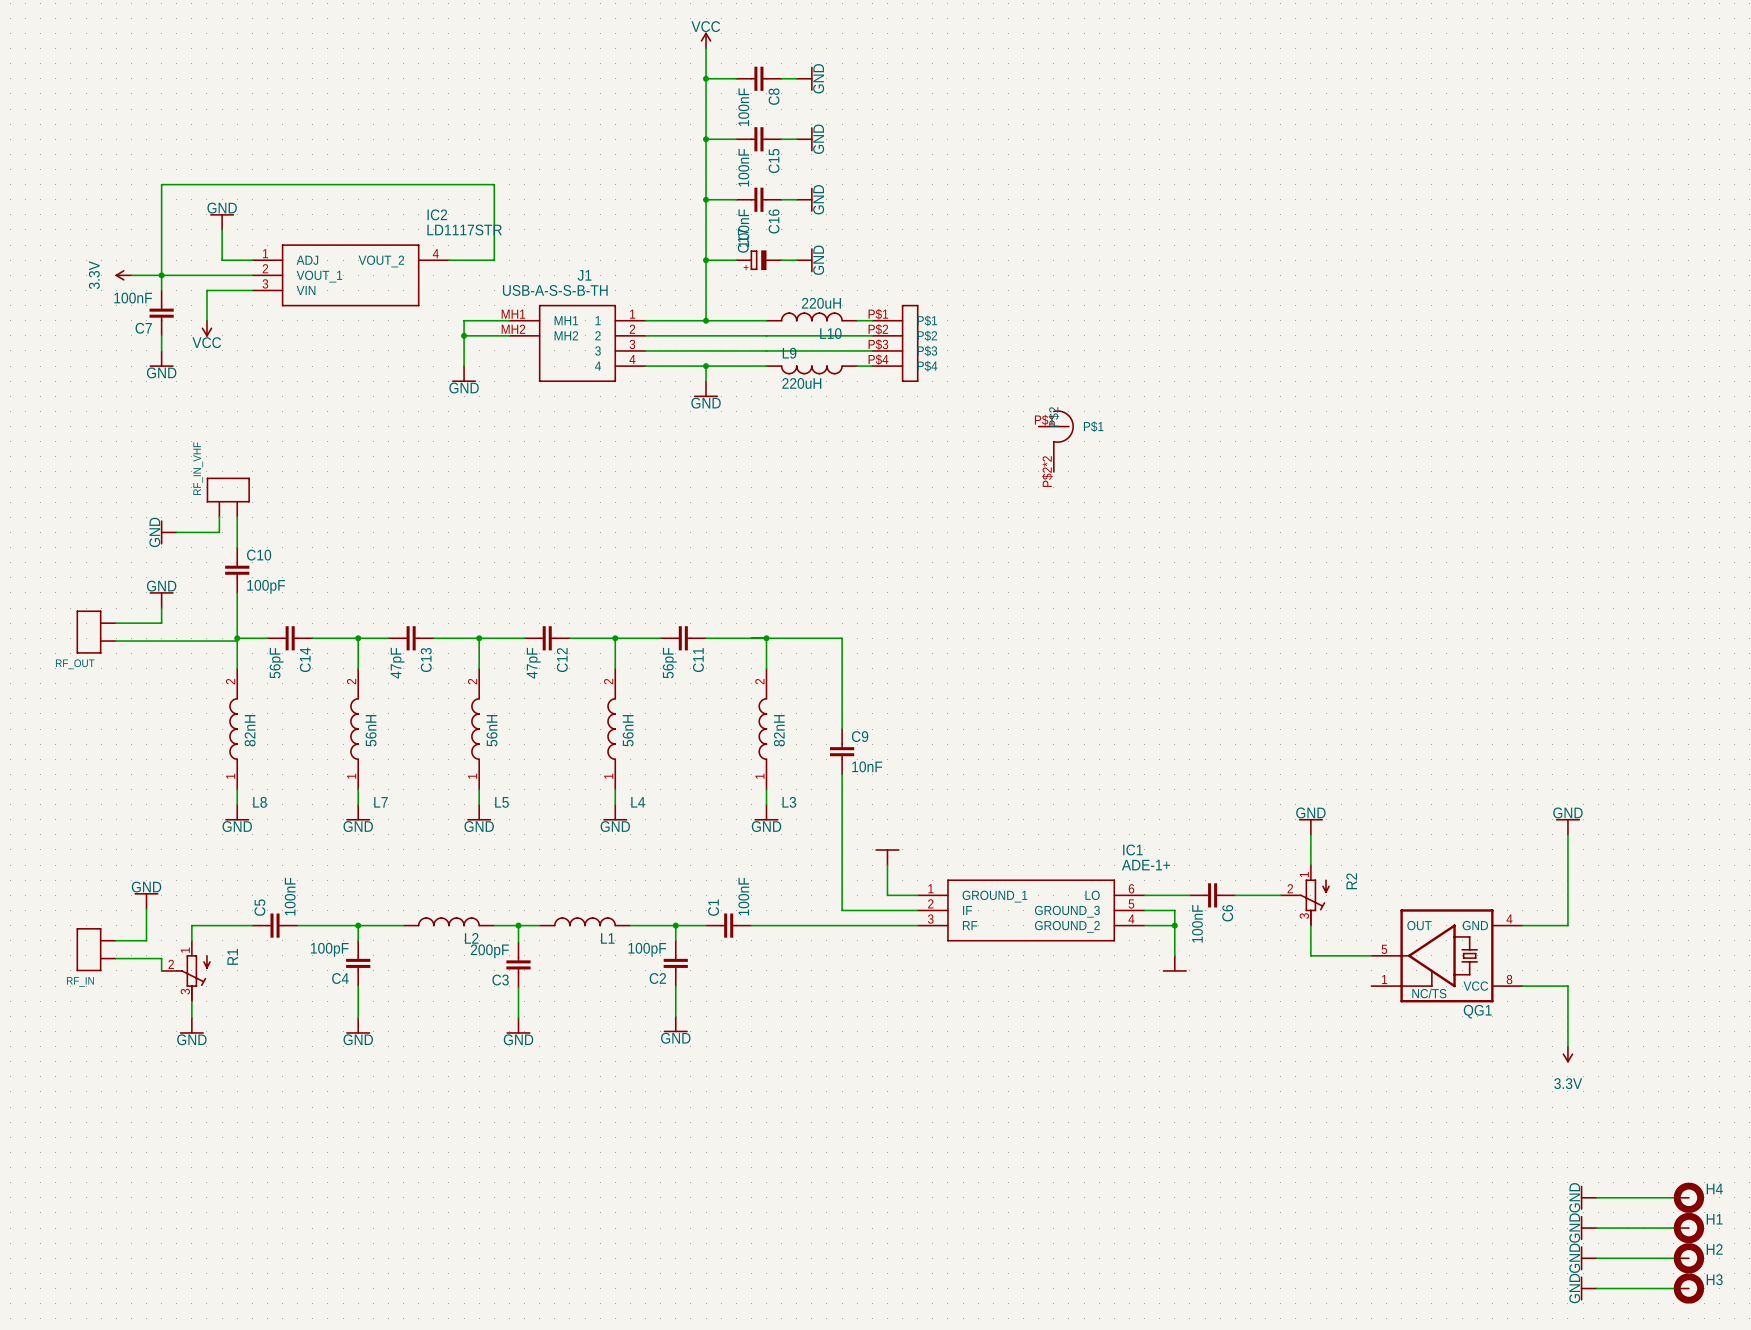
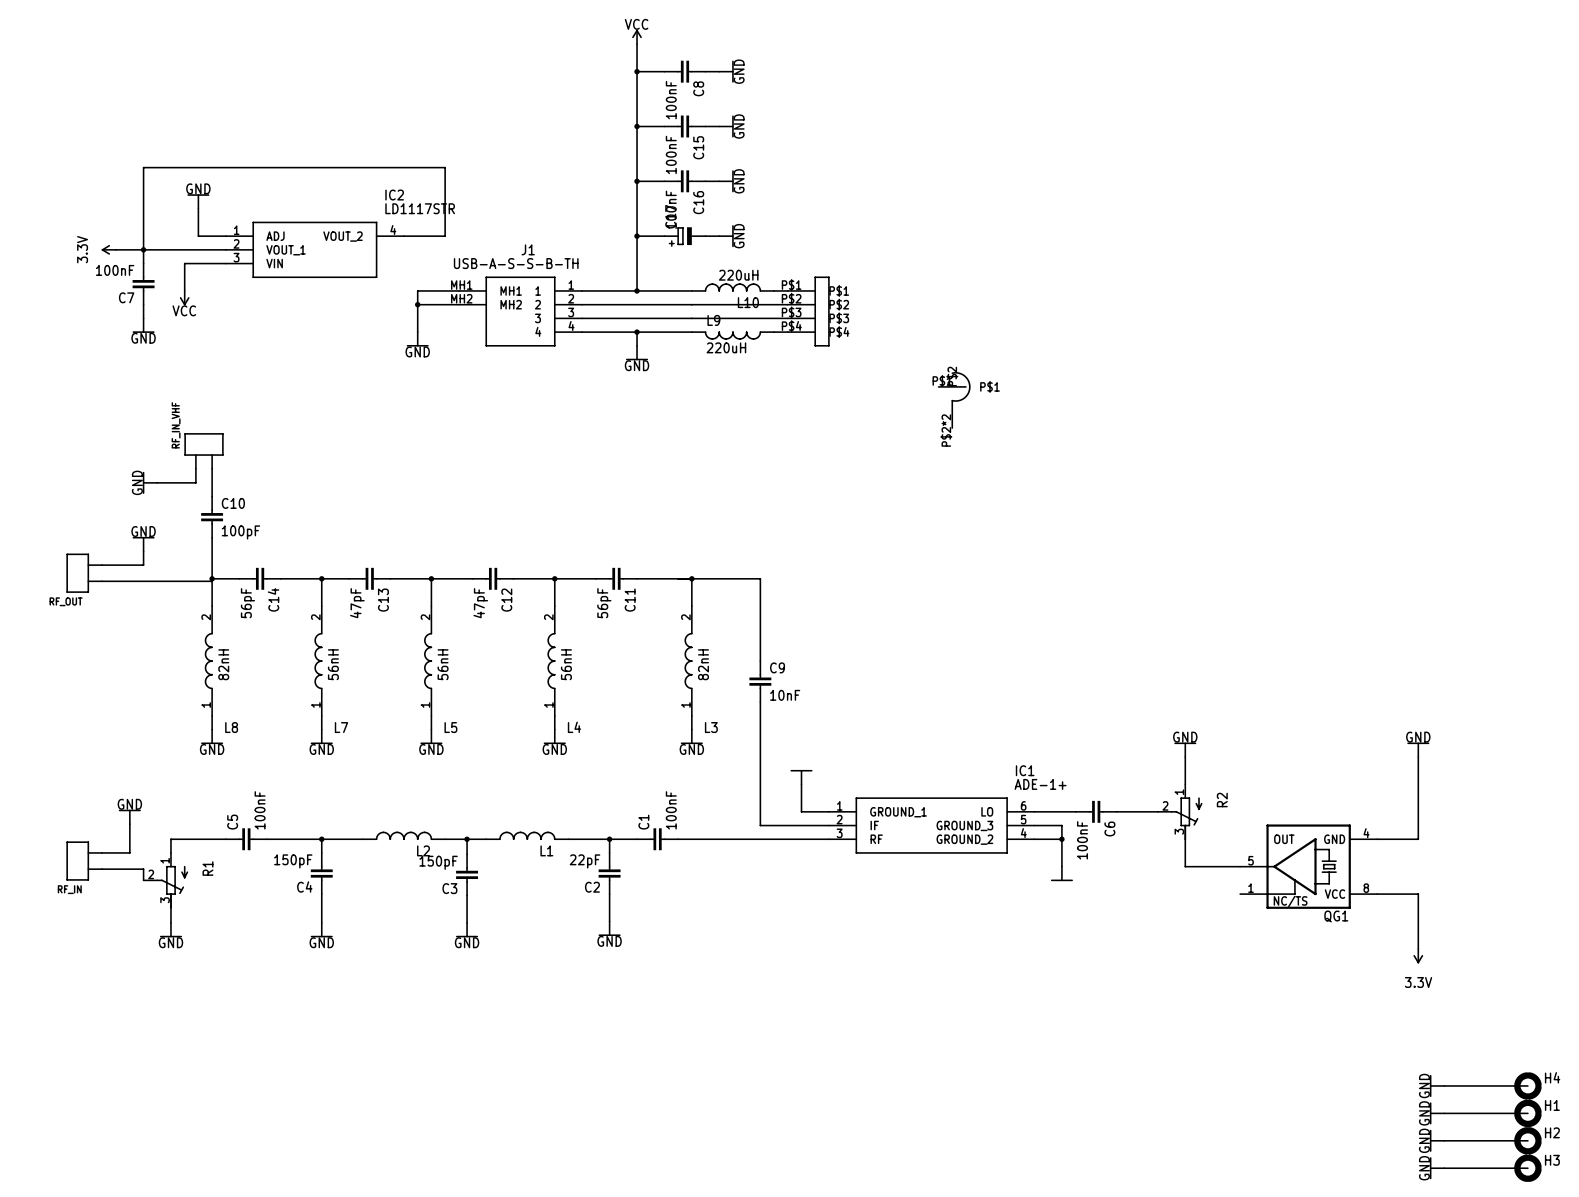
C4 value: 100pF (329, 949) -> 150pF (293, 861)
C2 value: 100pF (647, 949) -> 22pF (585, 861)
C3 value: 200pF (489, 951) -> 150pF (438, 862)

